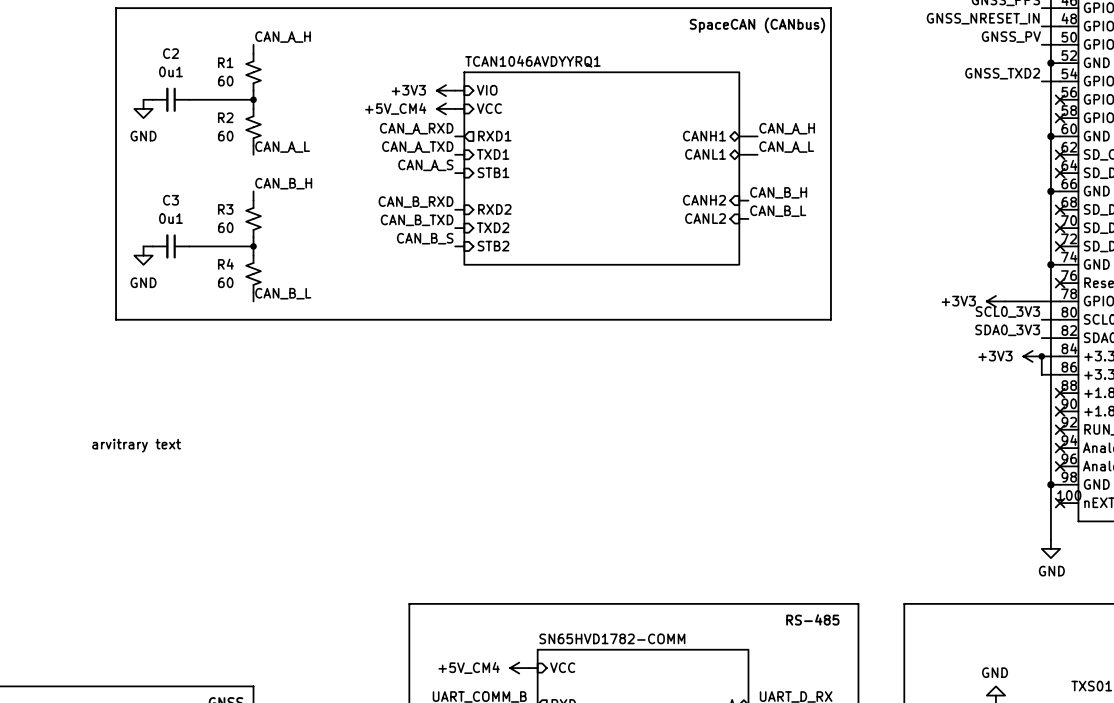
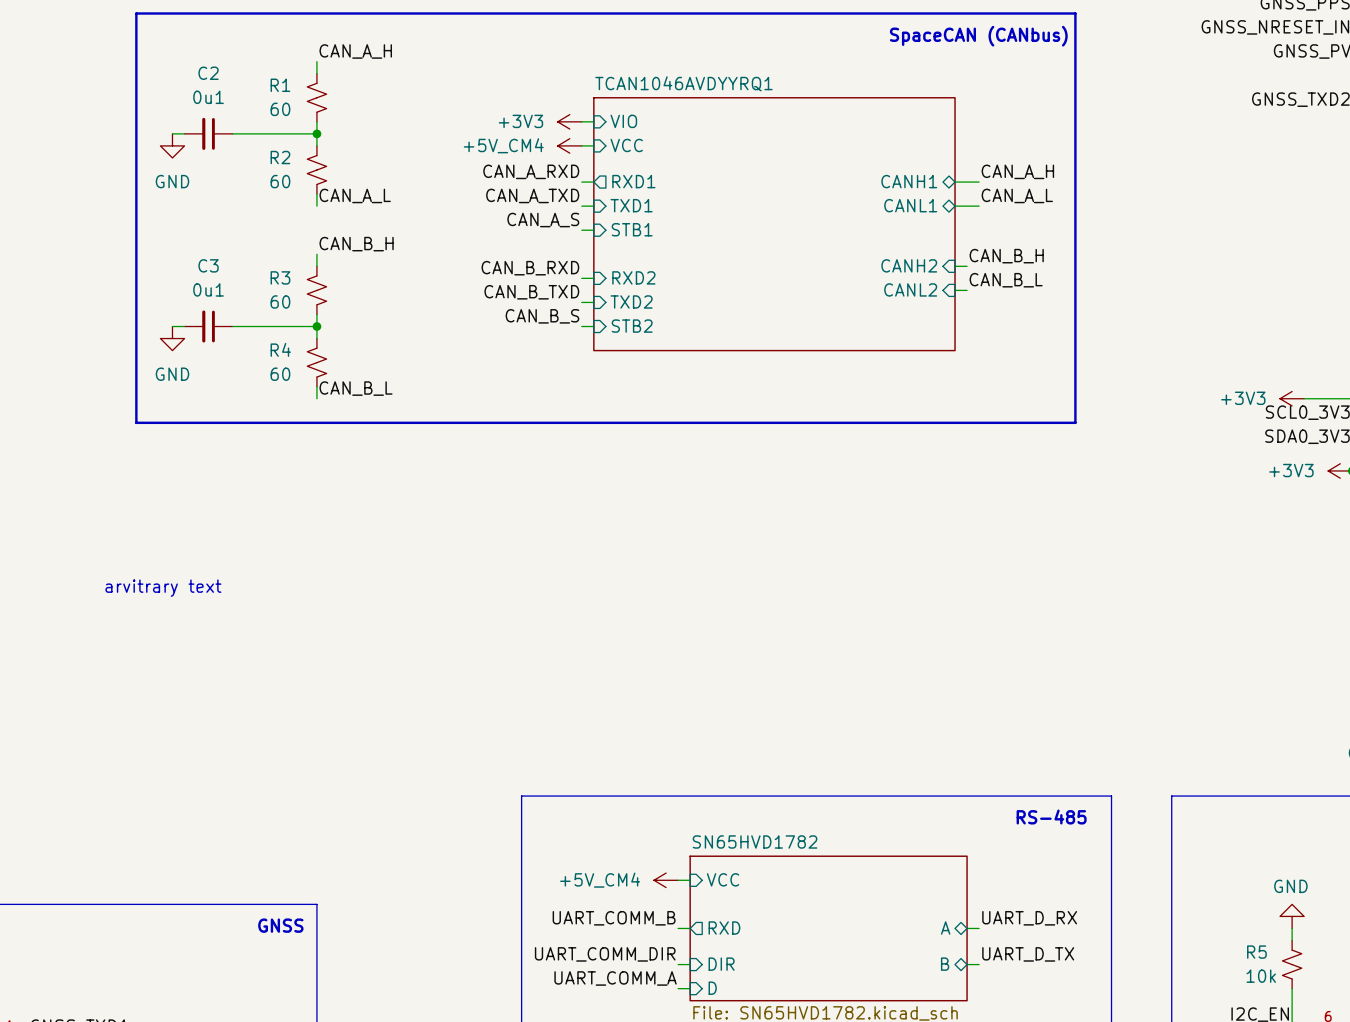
sheet SN65HVD1782-COMM name: SN65HVD1782-COMM (612, 638) -> SN65HVD1782 (755, 841)

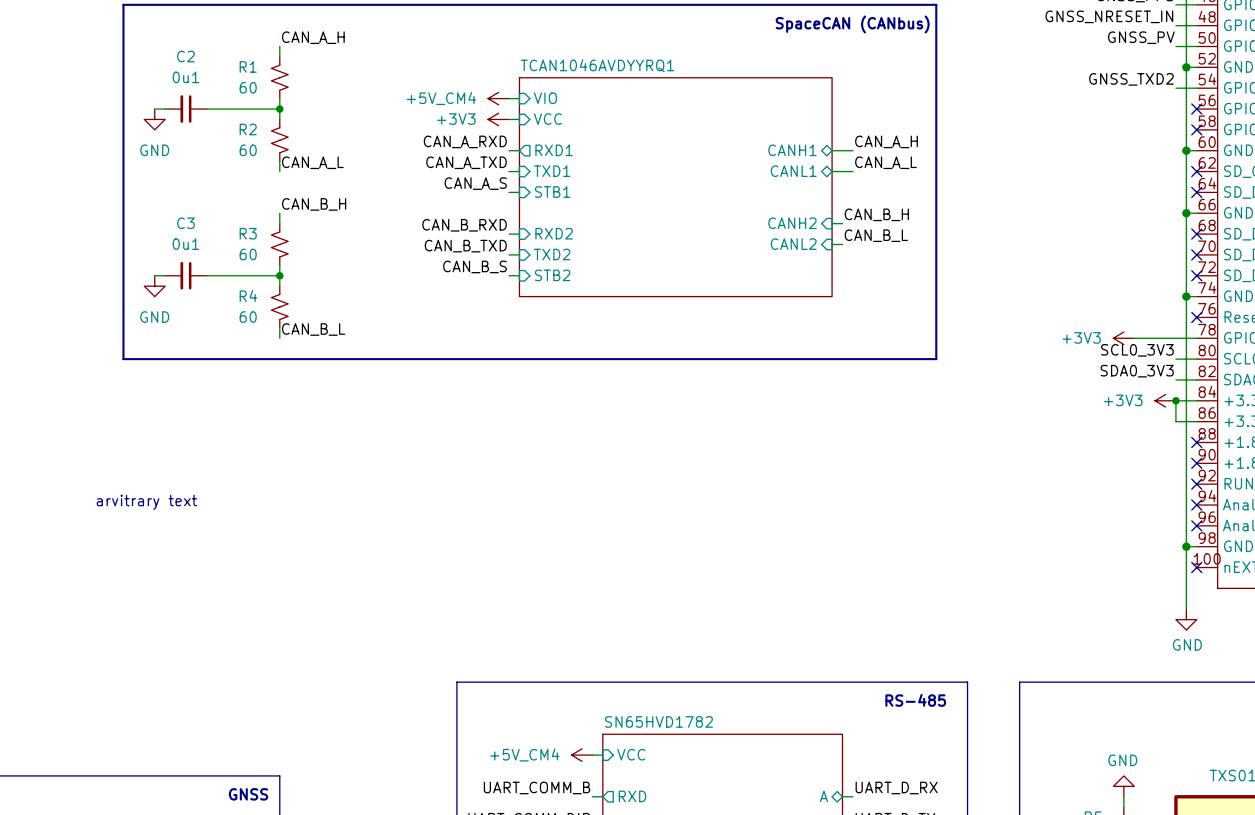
power symbol: +3V3 (569, 121) -> +5V_CM4 (498, 98)
power symbol: +5V_CM4 (569, 145) -> +3V3 (498, 119)

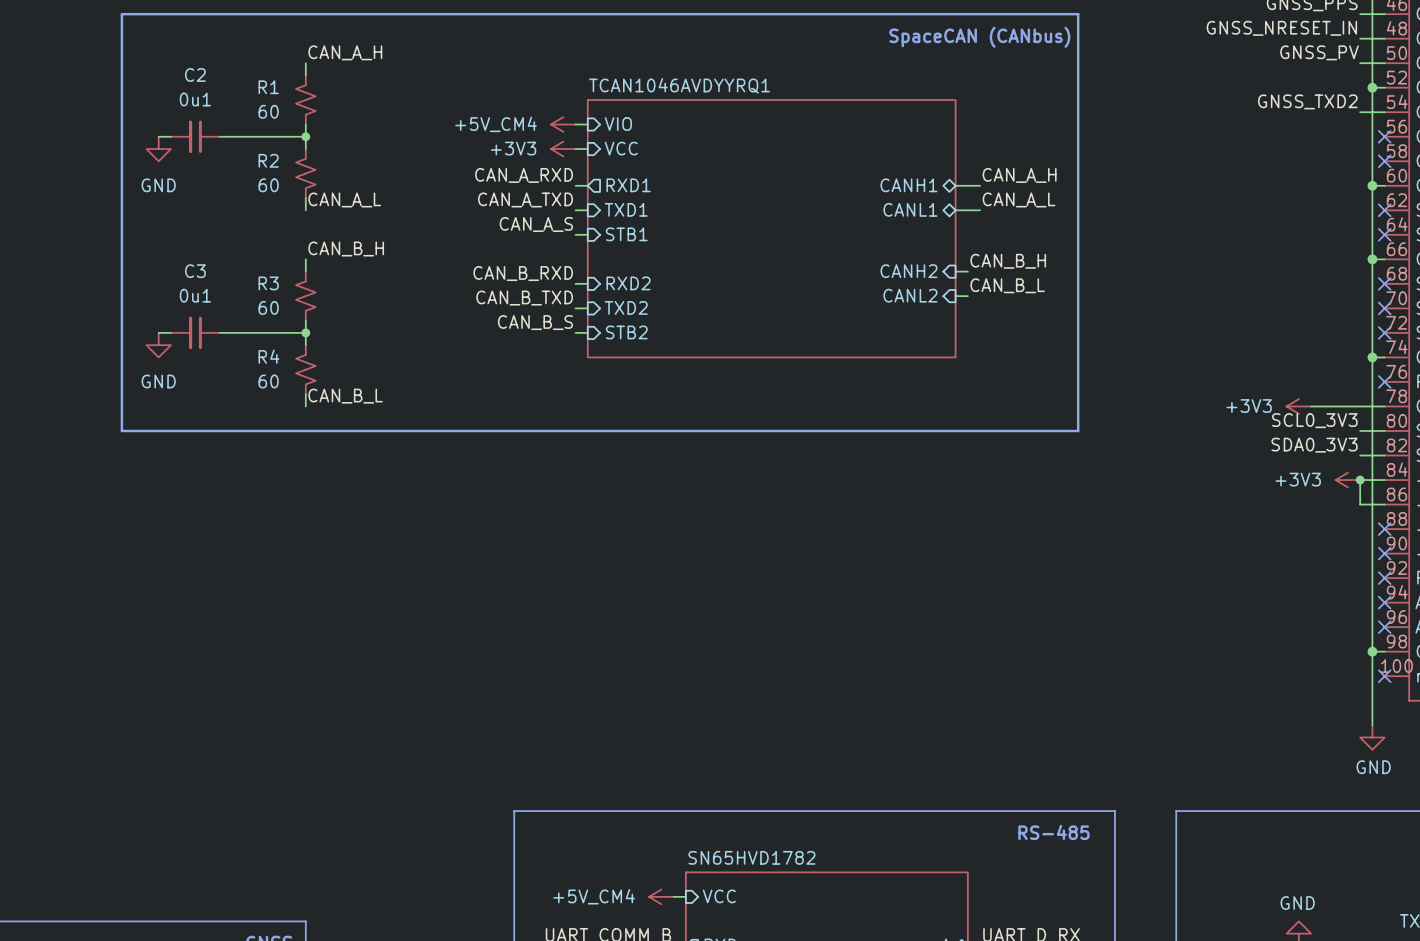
text: arvitrary text (146, 502) -> none

